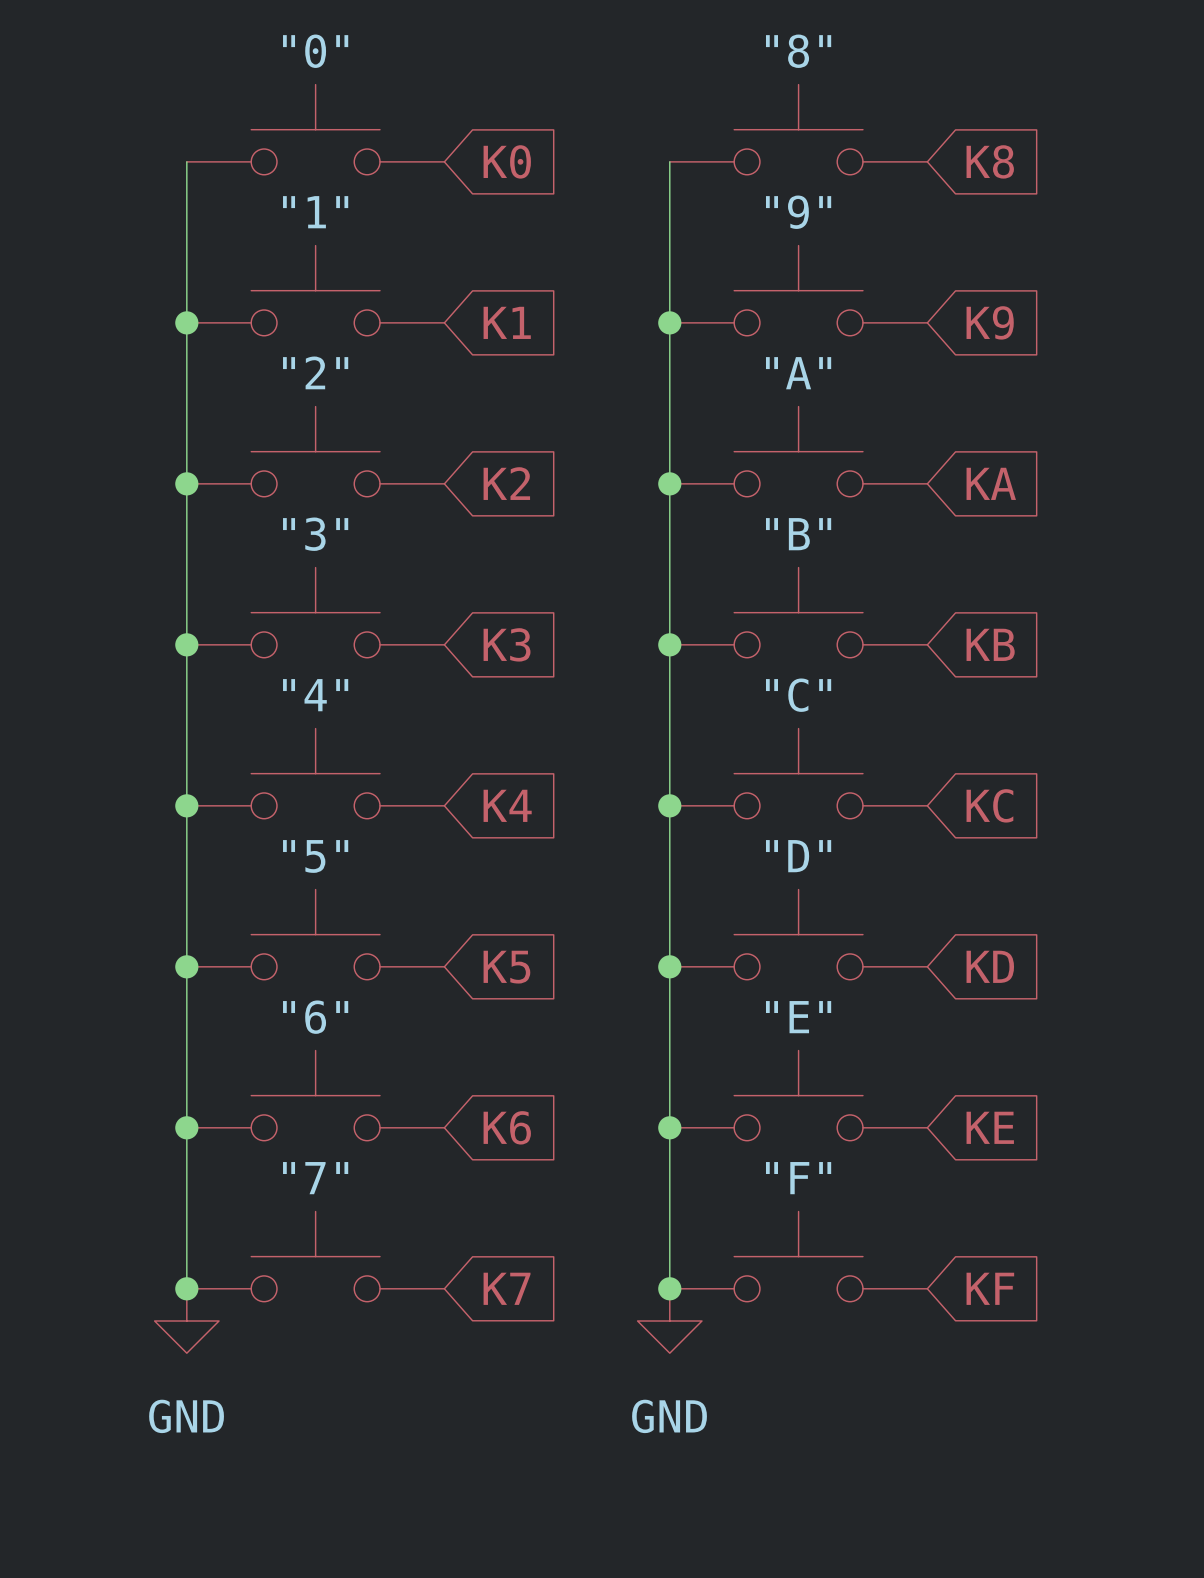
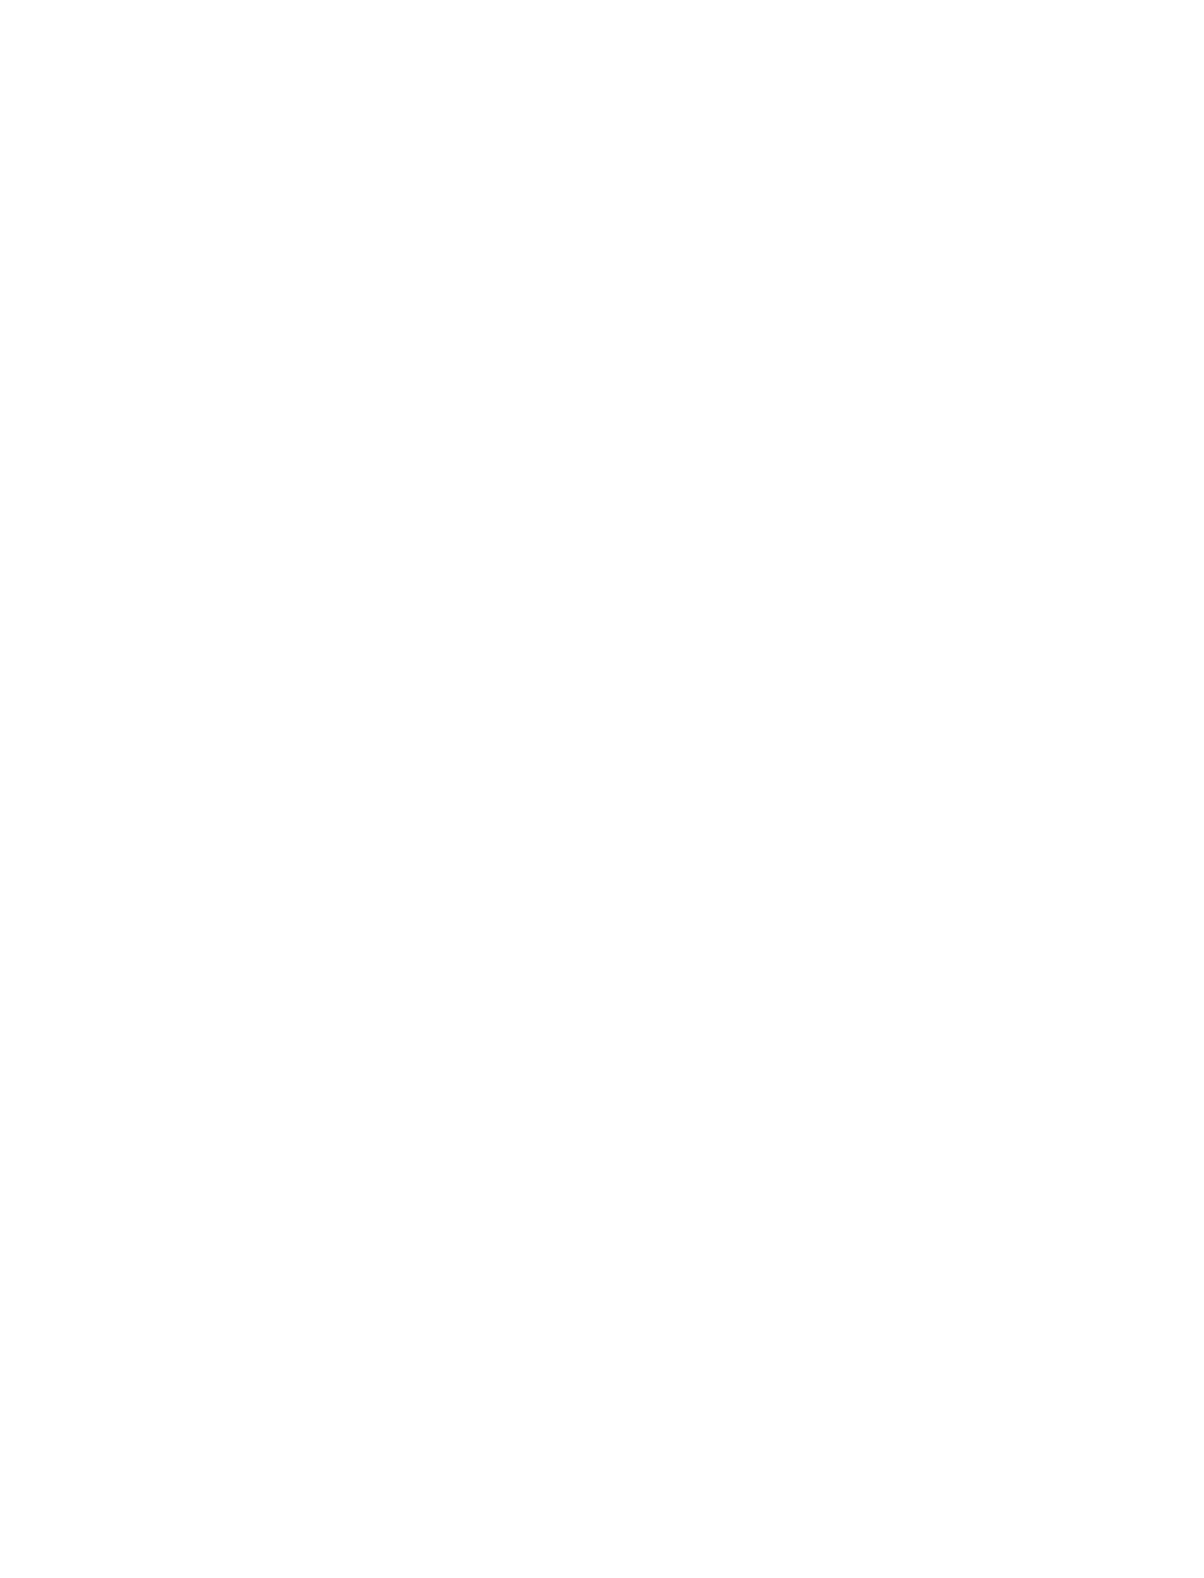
part: "0" (315, 129) -> none
part: "8" (798, 129) -> none
wire: (186, 161) (186, 1288) -> none
global label: K0 (507, 161) -> none
wire: (669, 161) (669, 1288) -> none
global label: K8 (990, 161) -> none
part: "1" (315, 290) -> none
part: "9" (798, 290) -> none
junction: (186, 322) -> none
global label: K1 (507, 322) -> none
junction: (669, 322) -> none
global label: K9 (990, 322) -> none
part: "2" (315, 451) -> none
part: "A" (798, 451) -> none
junction: (186, 483) -> none
global label: K2 (506, 483) -> none
junction: (669, 483) -> none
global label: KA (991, 483) -> none
part: "3" (315, 612) -> none
part: "B" (798, 612) -> none
junction: (186, 644) -> none
global label: K3 (507, 644) -> none
junction: (669, 644) -> none
global label: KB (990, 644) -> none
part: "4" (315, 773) -> none
part: "C" (798, 773) -> none
junction: (186, 805) -> none
global label: K4 (507, 805) -> none
junction: (669, 805) -> none
global label: KC (989, 805) -> none
part: "5" (315, 934) -> none
part: "D" (798, 934) -> none
junction: (186, 966) -> none
junction: (669, 966) -> none
global label: KD (990, 966) -> none
global label: K5 (506, 967) -> none
part: "6" (315, 1095) -> none
part: "E" (798, 1095) -> none
junction: (186, 1127) -> none
global label: K6 (507, 1127) -> none
junction: (669, 1127) -> none
global label: KE (990, 1127) -> none
part: "7" (315, 1256) -> none
part: "F" (798, 1256) -> none
junction: (186, 1288) -> none
global label: K7 (507, 1288) -> none
junction: (669, 1288) -> none
global label: KF (990, 1288) -> none
power symbol: GND (186, 1321) -> none
power symbol: GND (669, 1321) -> none

